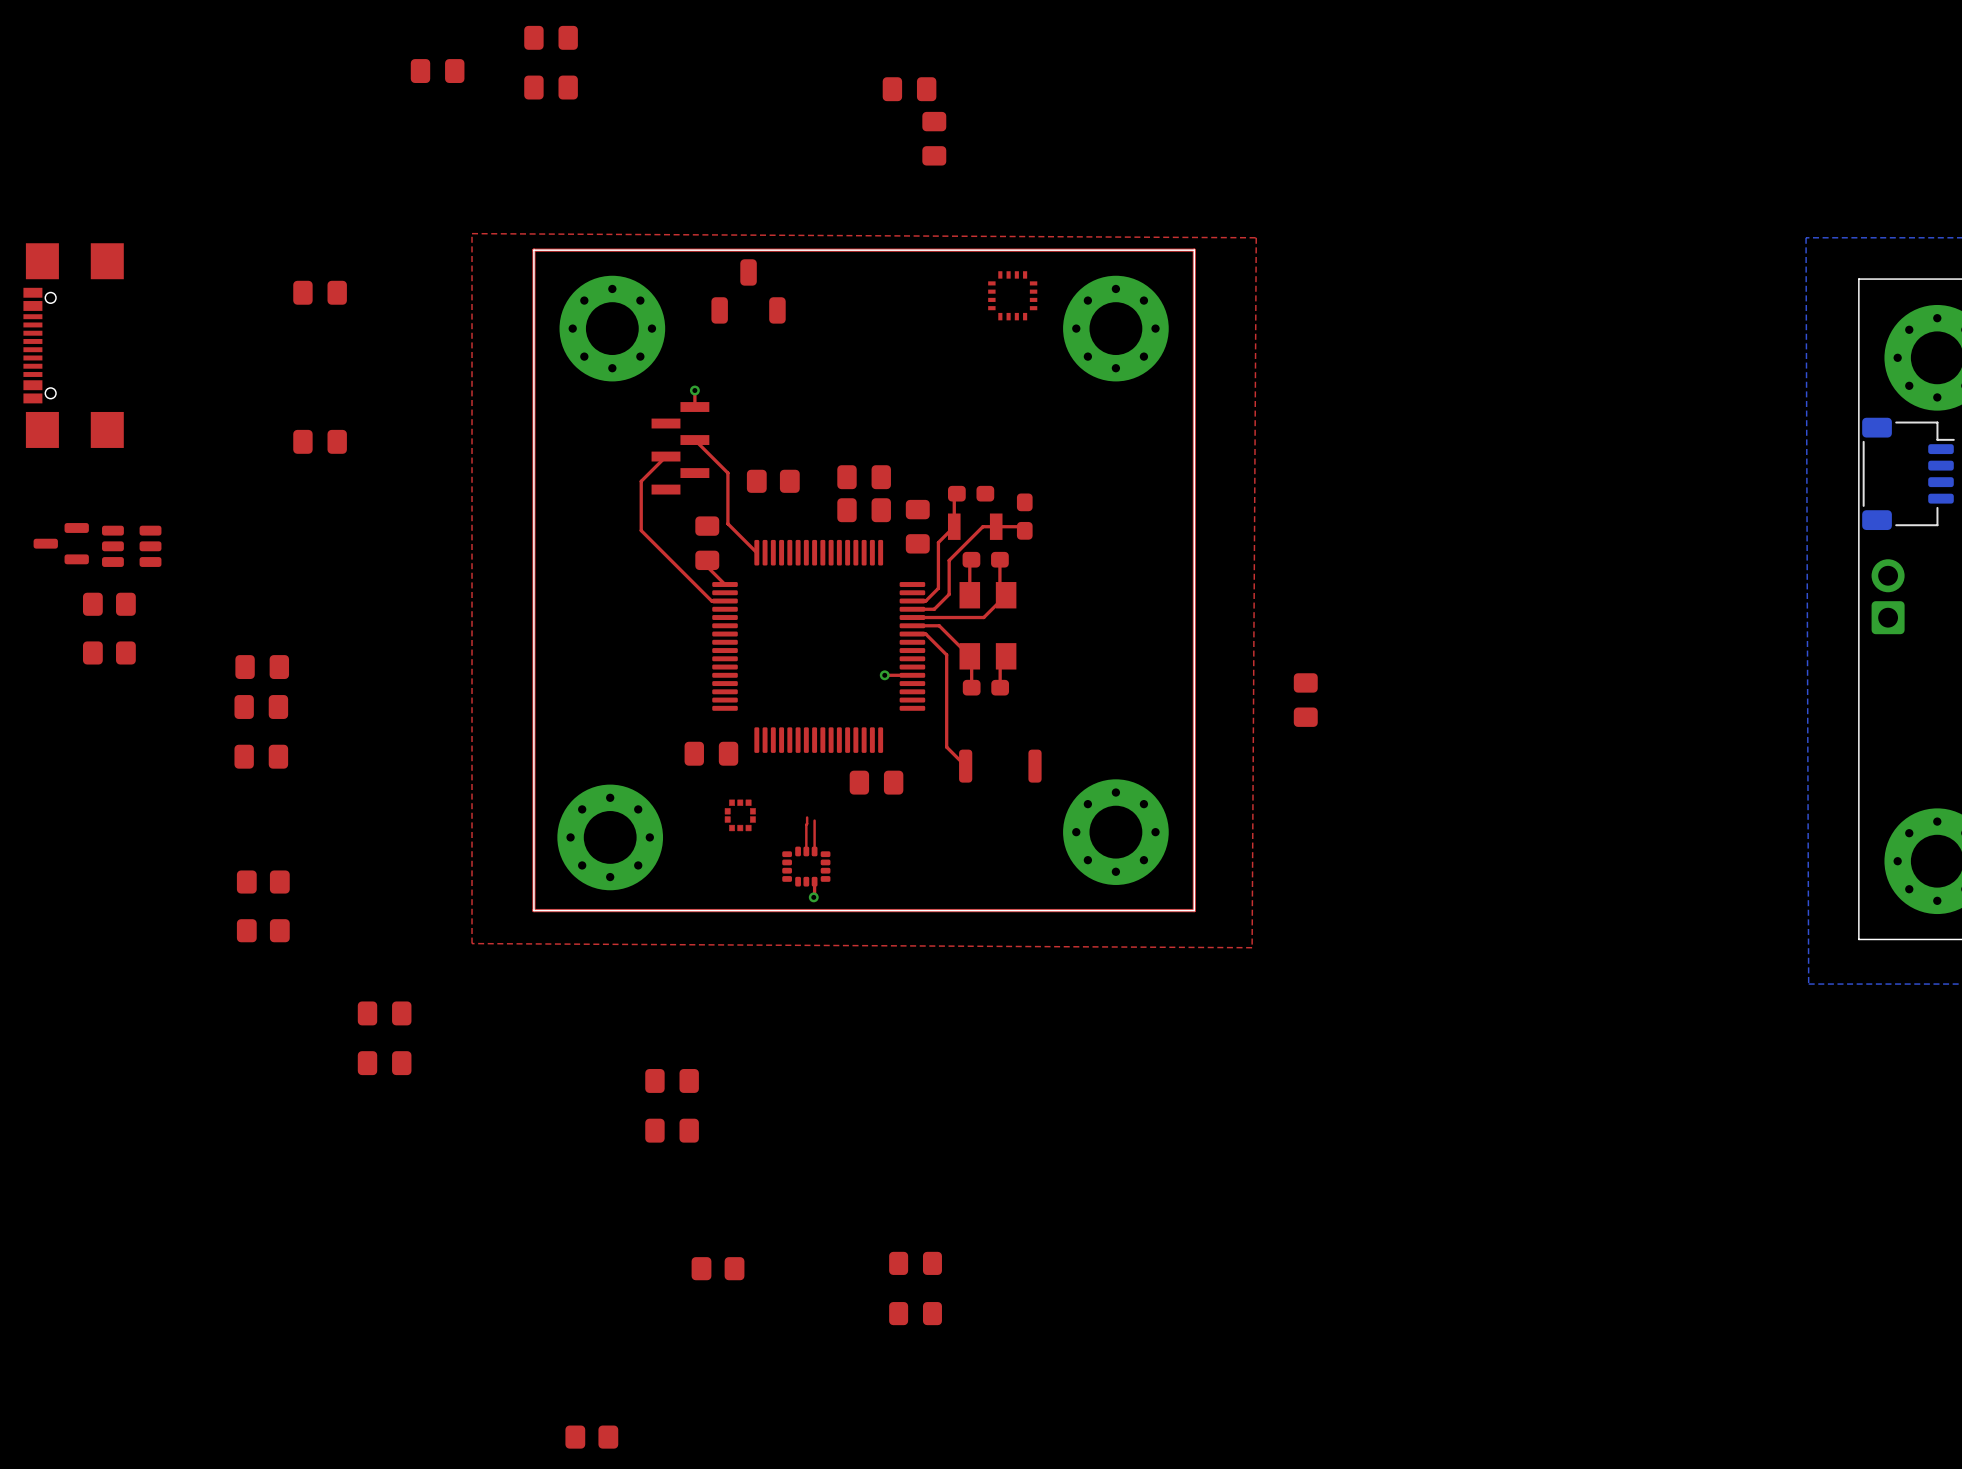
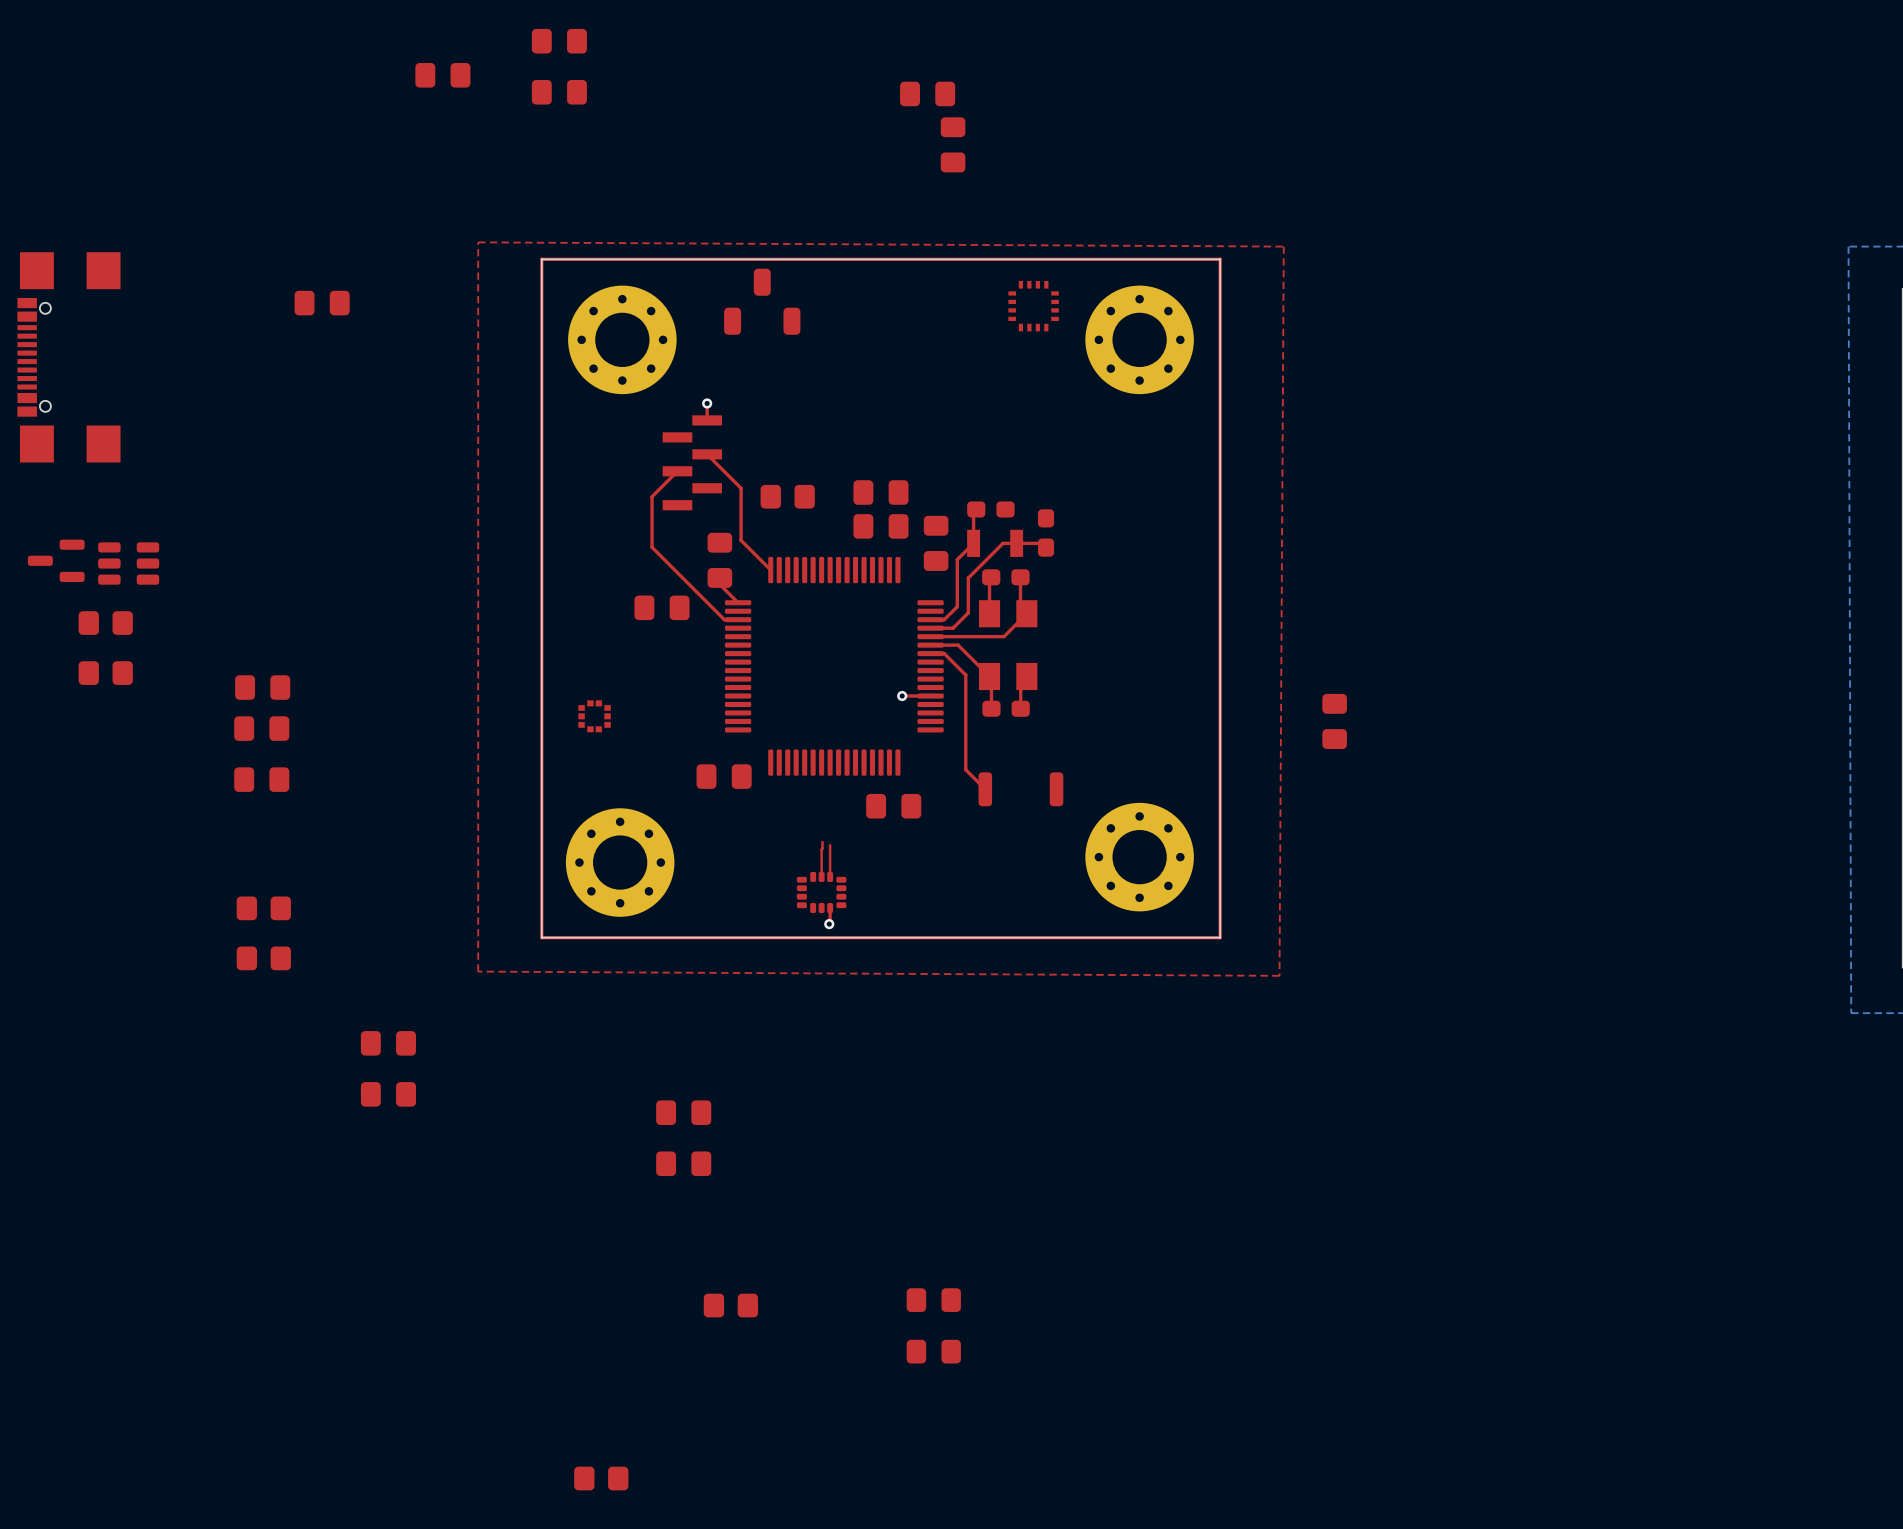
part position: (320, 441) -> (662, 607)
part rotation: 0° (740, 815) -> 90° clockwise (594, 716)
part position: (740, 815) -> (594, 716)

